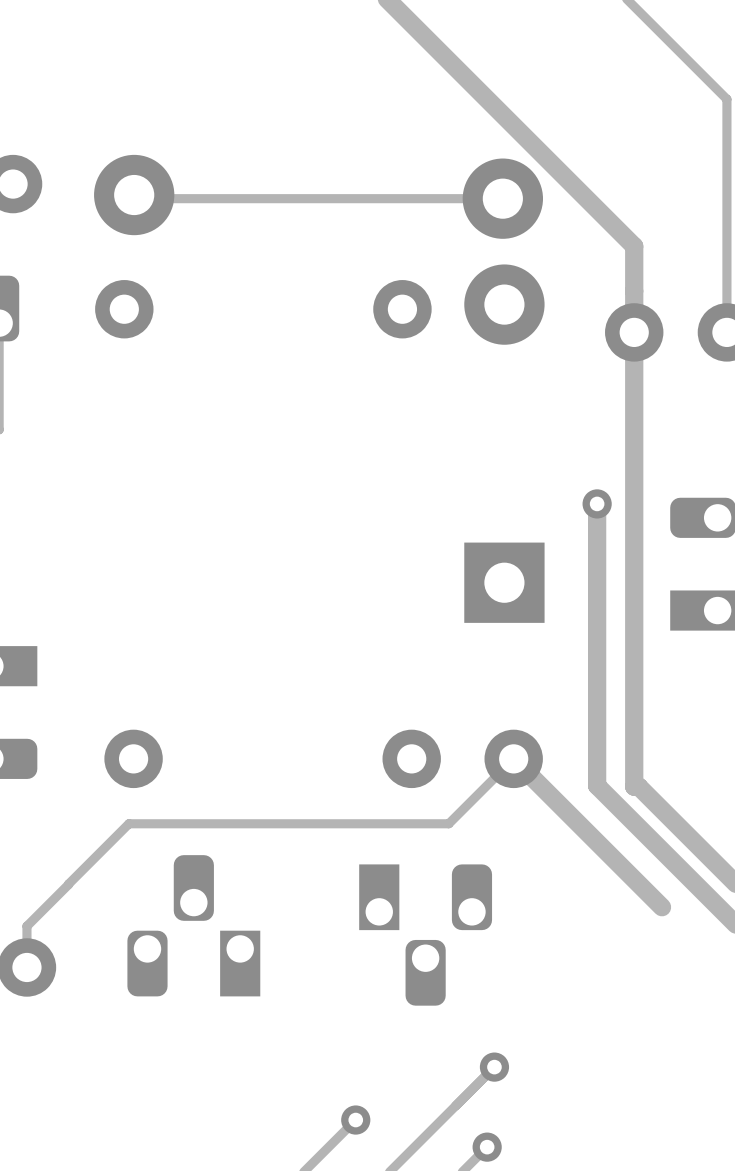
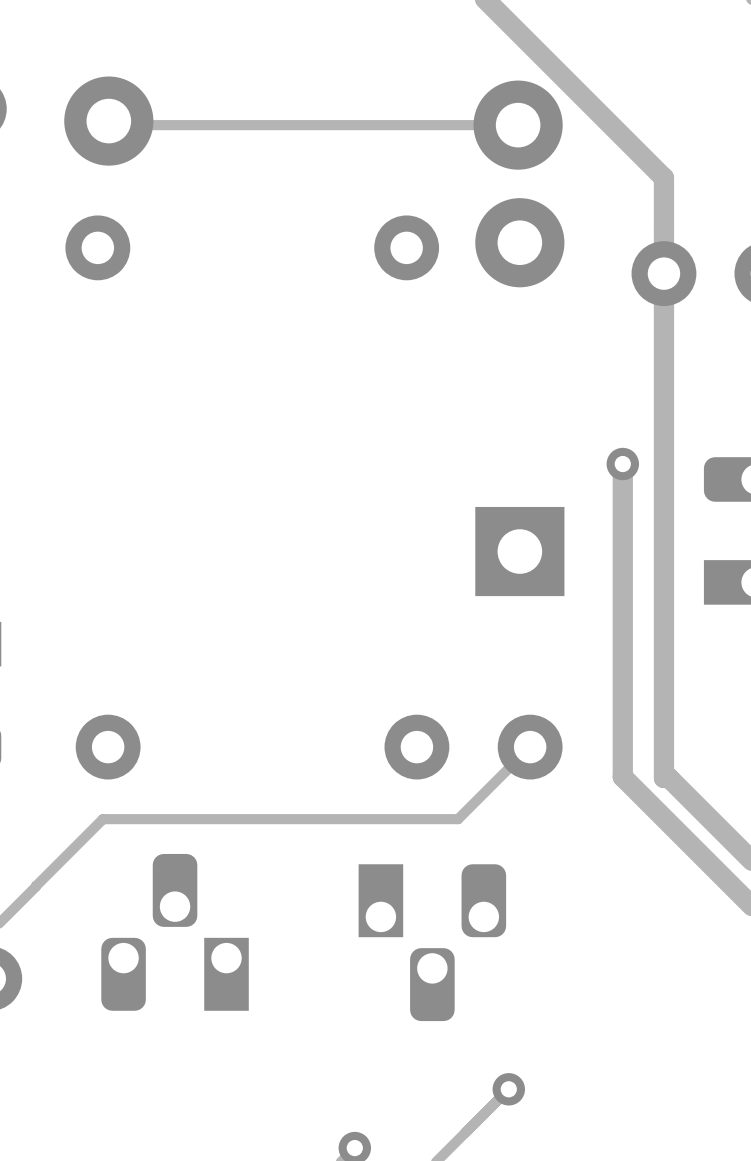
track: (513, 758) (662, 907) -> none

